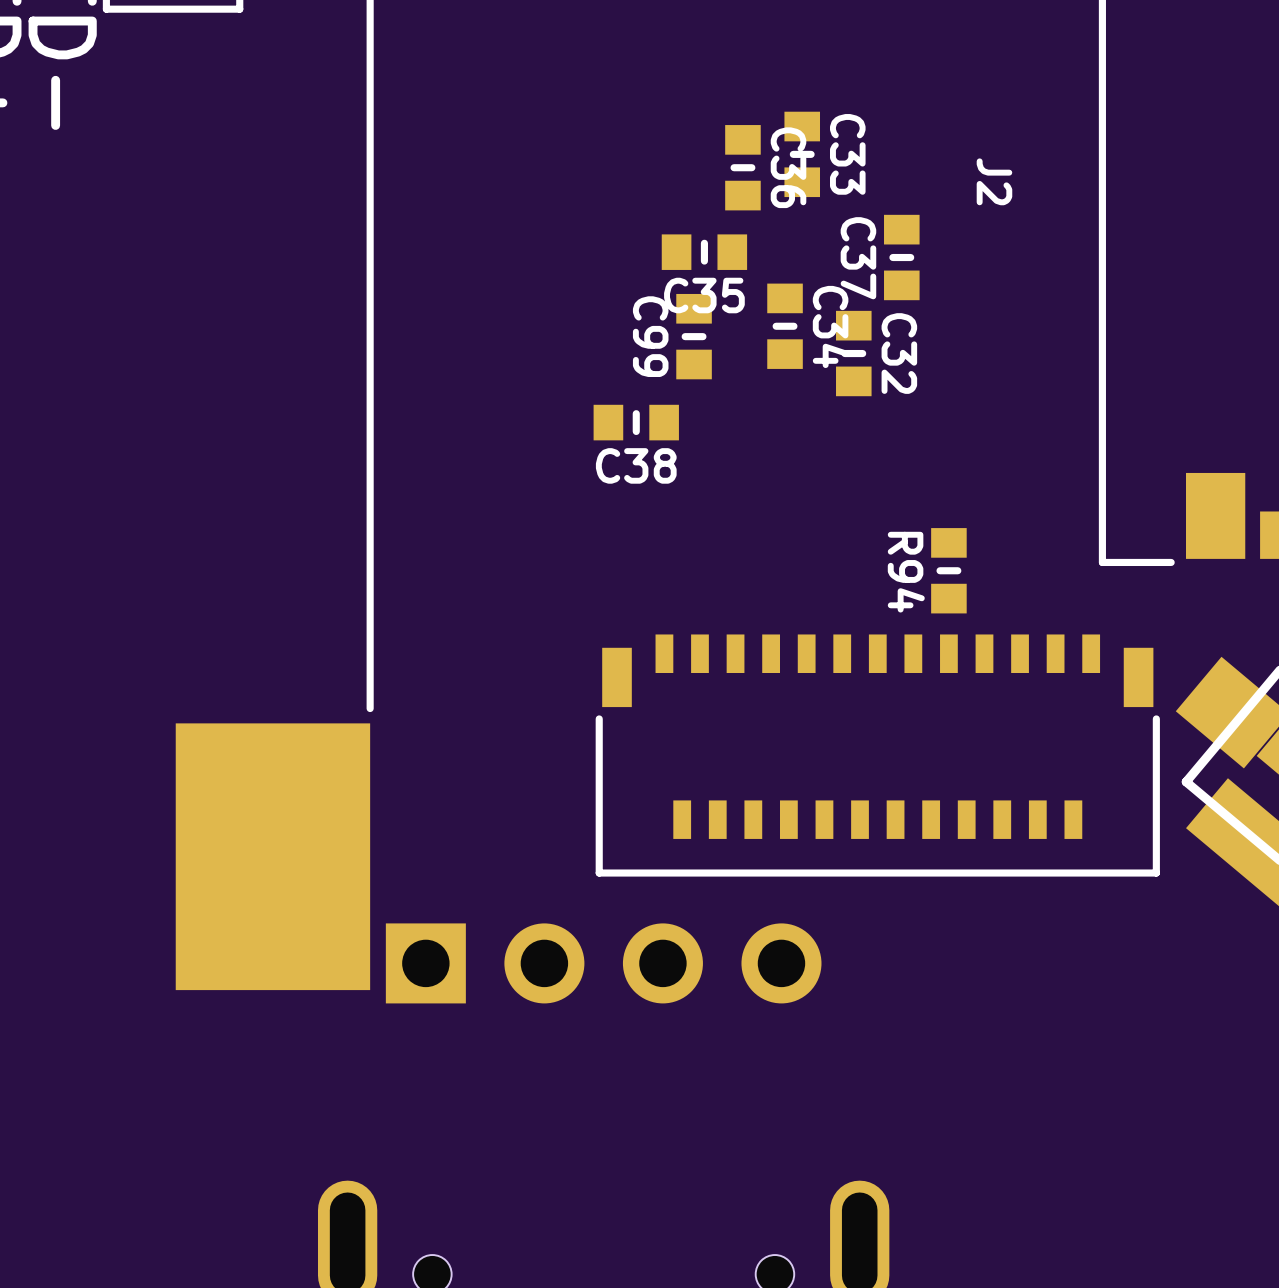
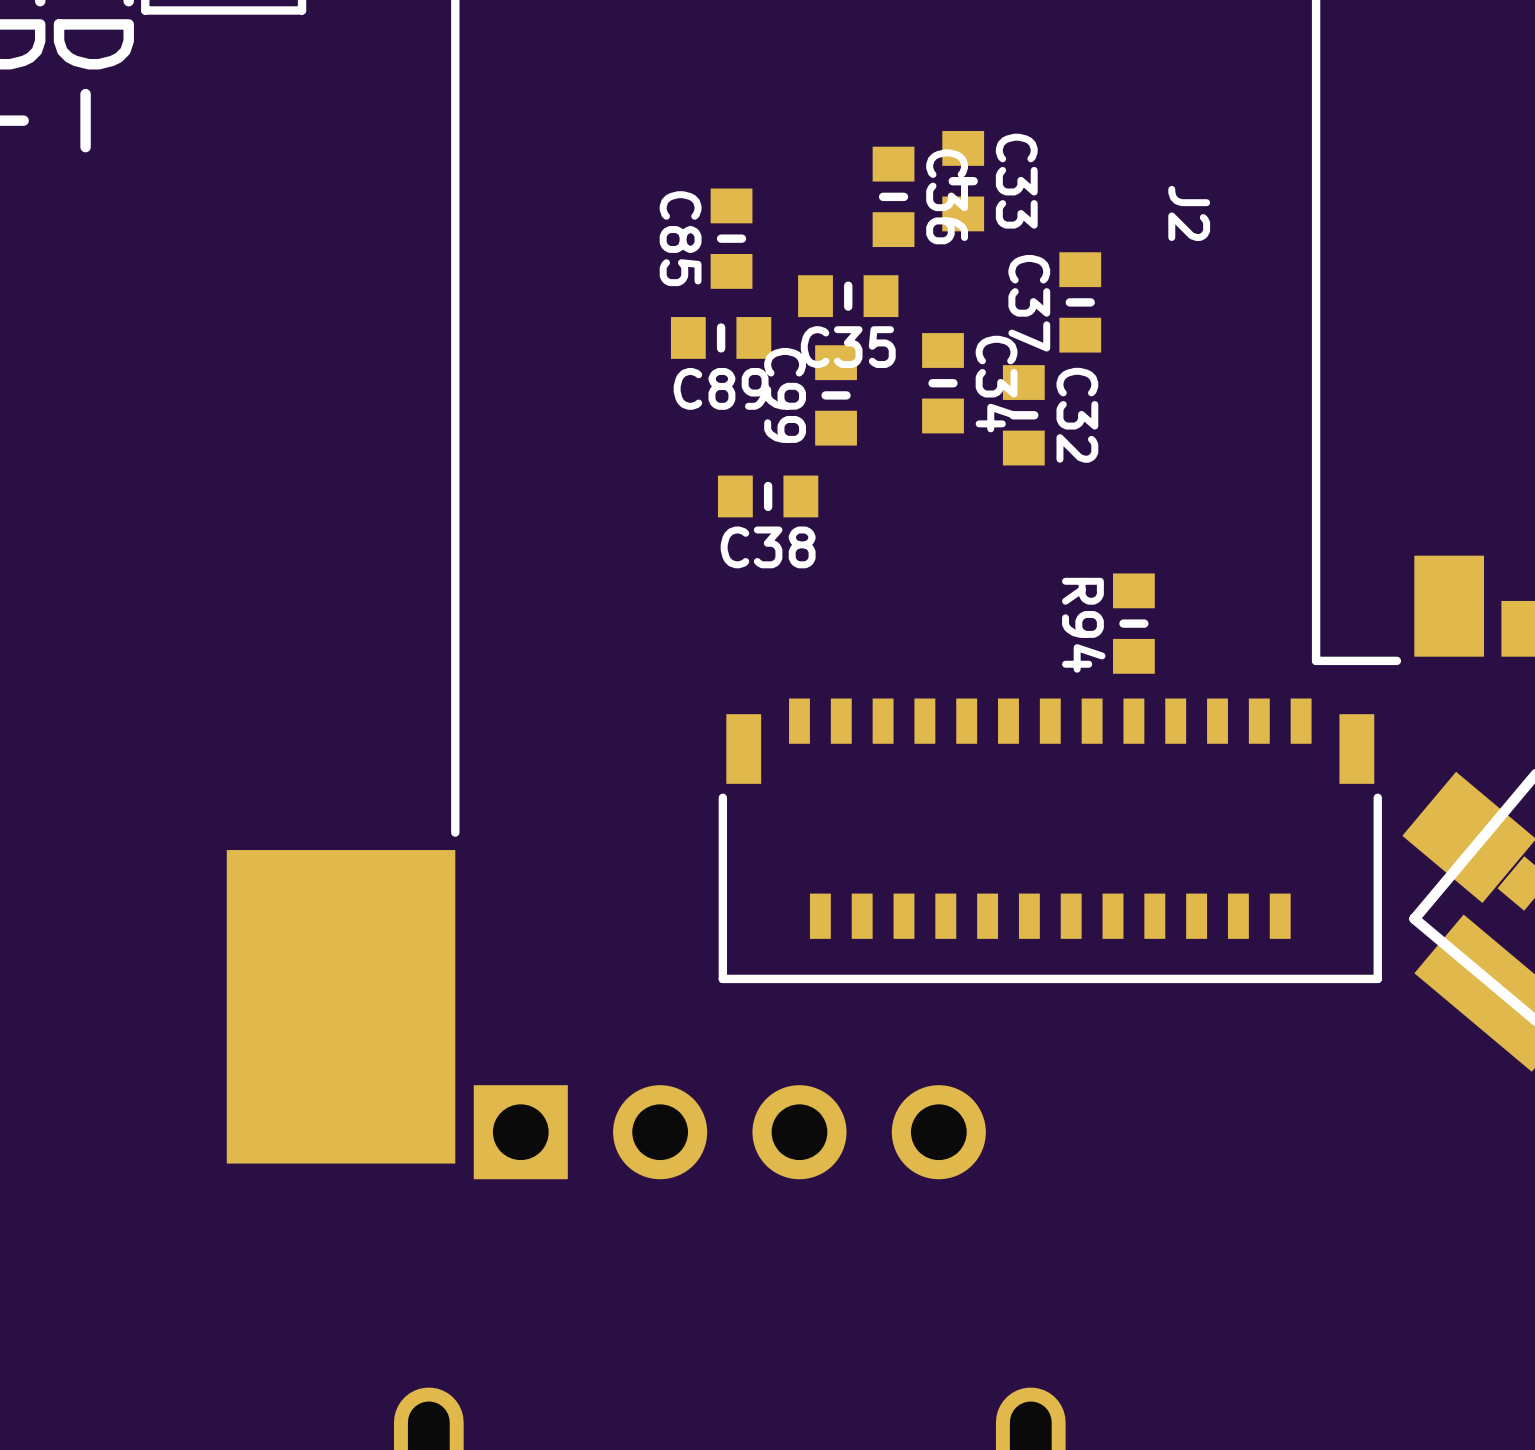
C85: none -> (731, 238)
C89: none -> (721, 337)
R94 position: (948, 570) -> (1133, 623)
part position: (877, 755) -> (1050, 840)

